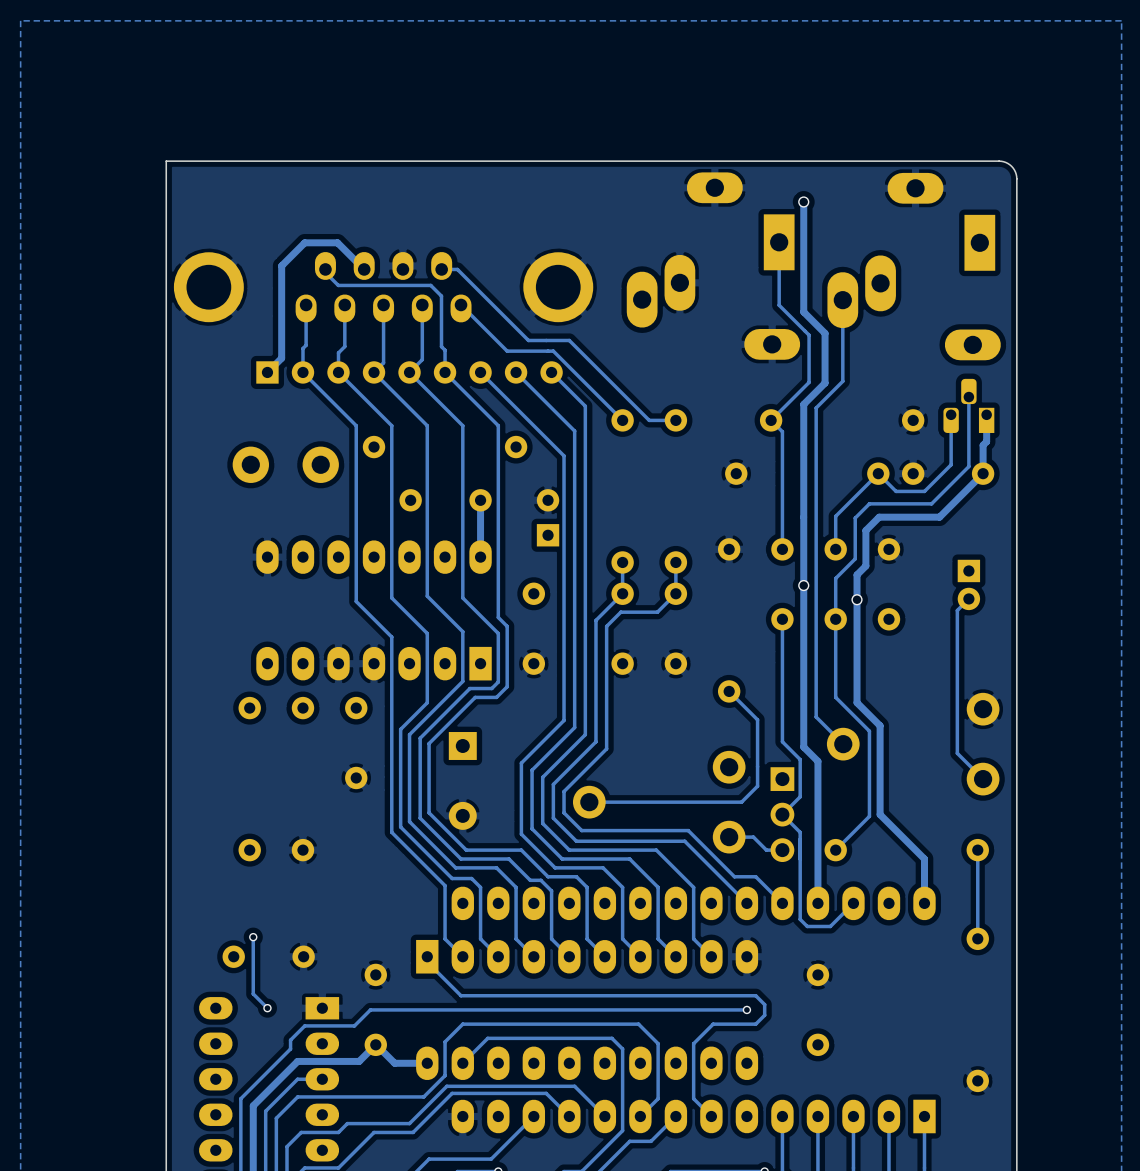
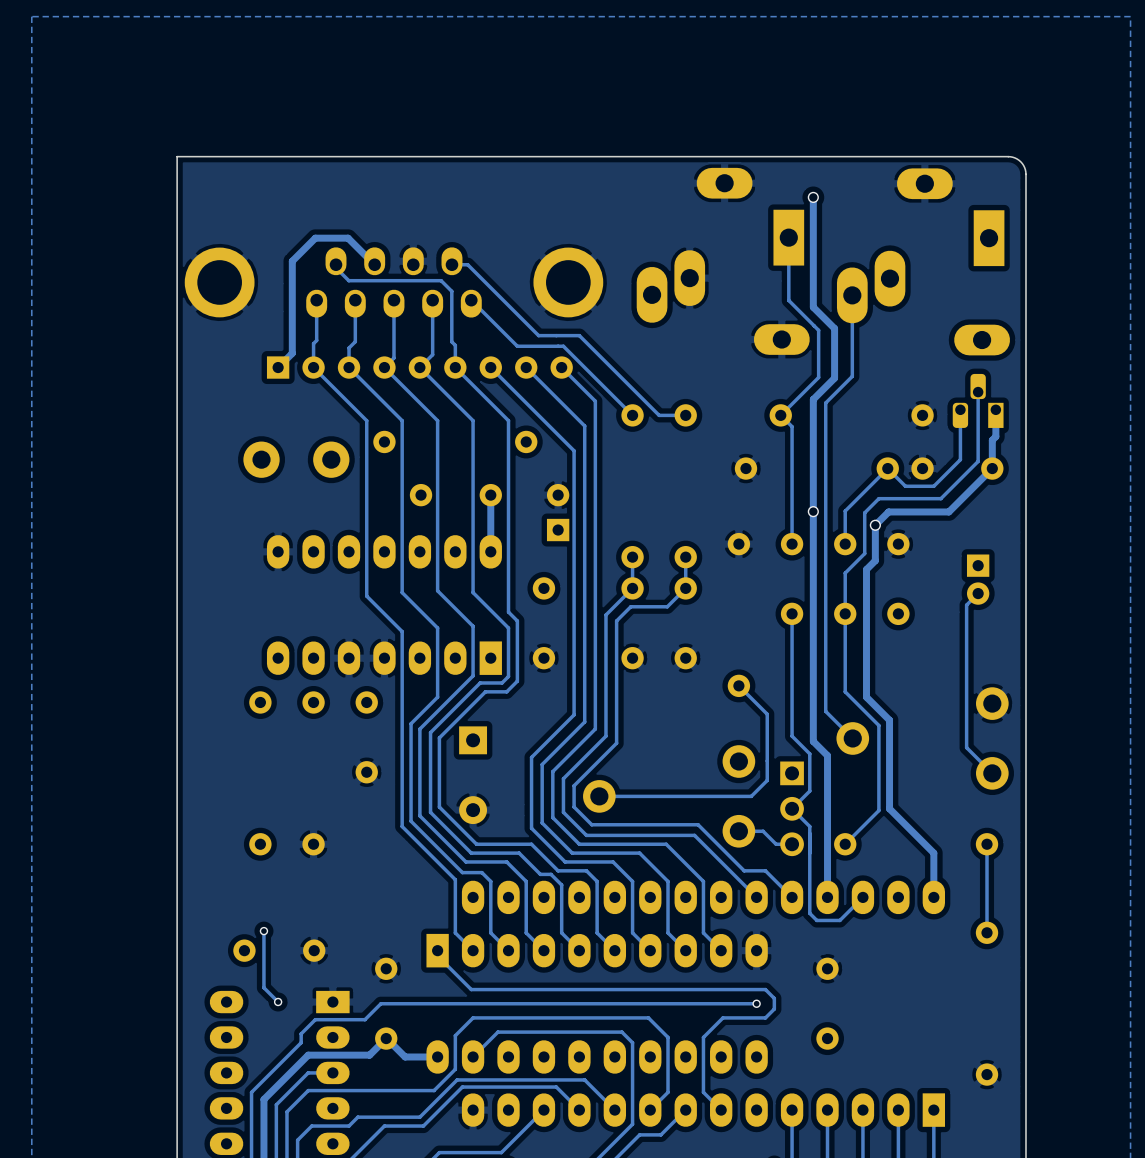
via: none -> (813, 511)
via: none -> (875, 525)
via: (803, 585) -> none
via: (857, 599) -> none

